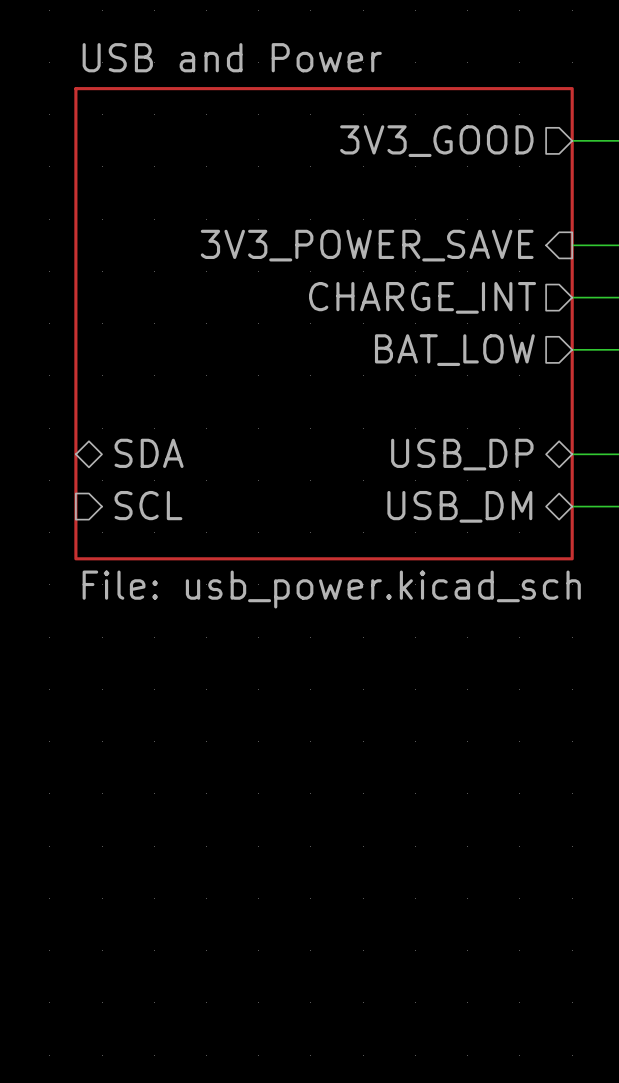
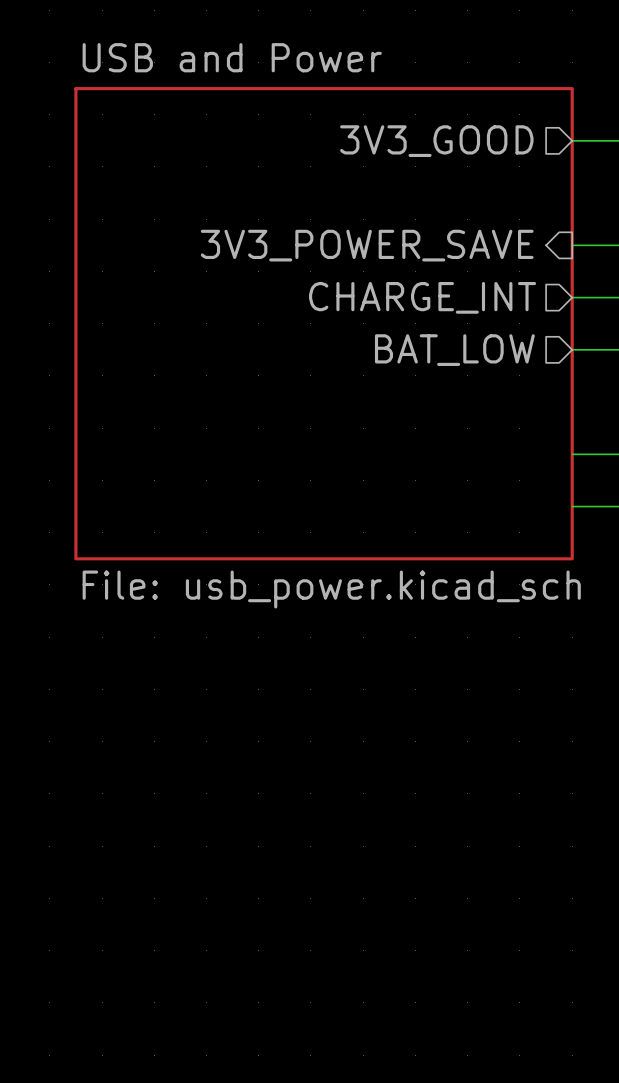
sheet pin: SDA (149, 453) -> none
sheet pin: USB_DP (462, 454) -> none
sheet pin: SCL (148, 505) -> none
sheet pin: USB_DM (459, 506) -> none

